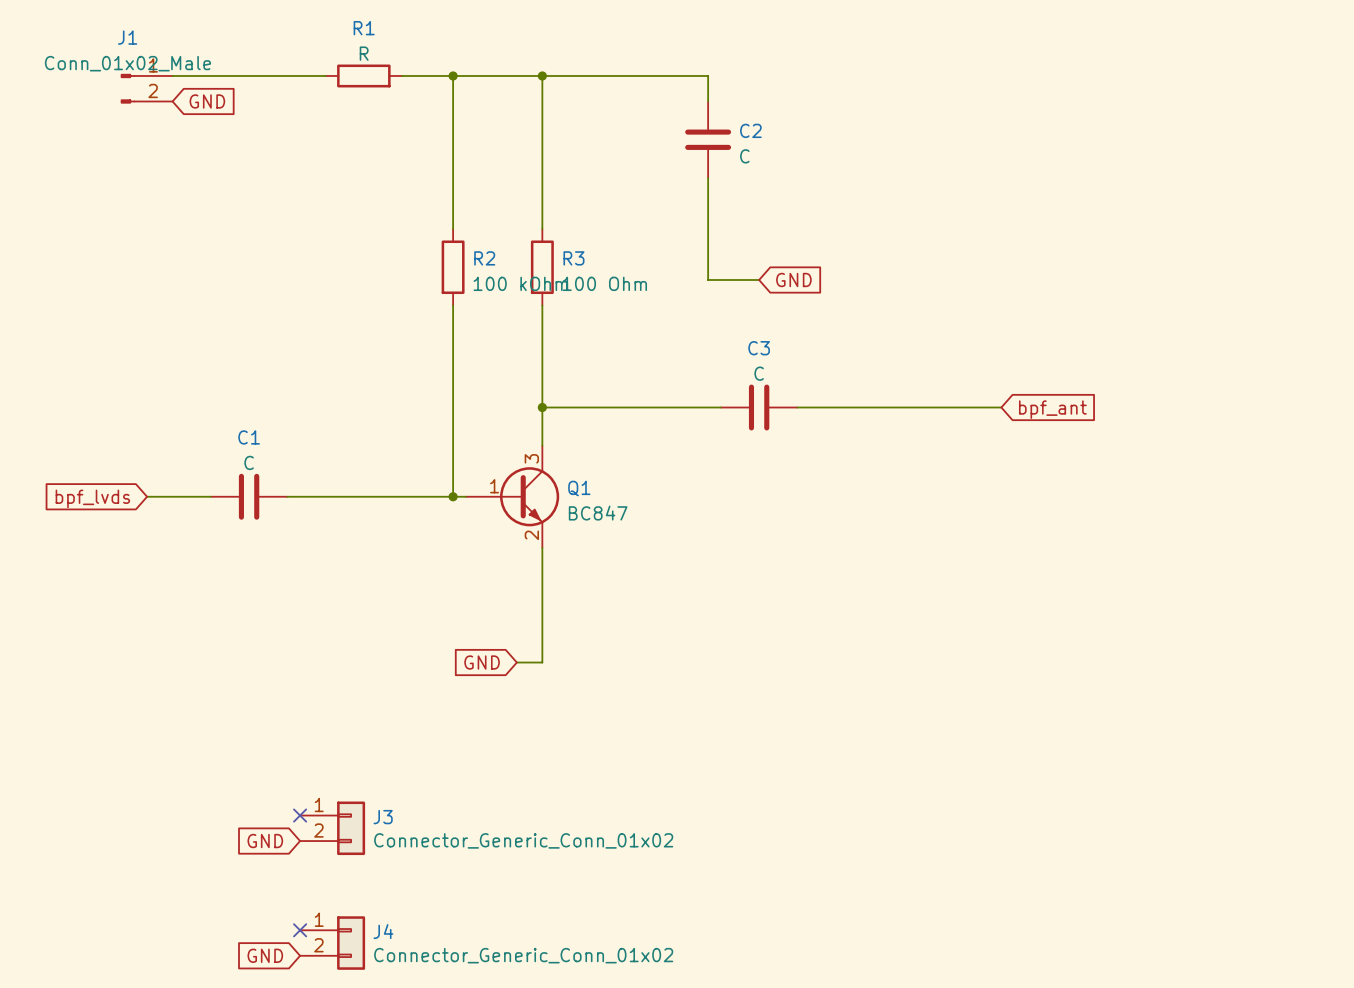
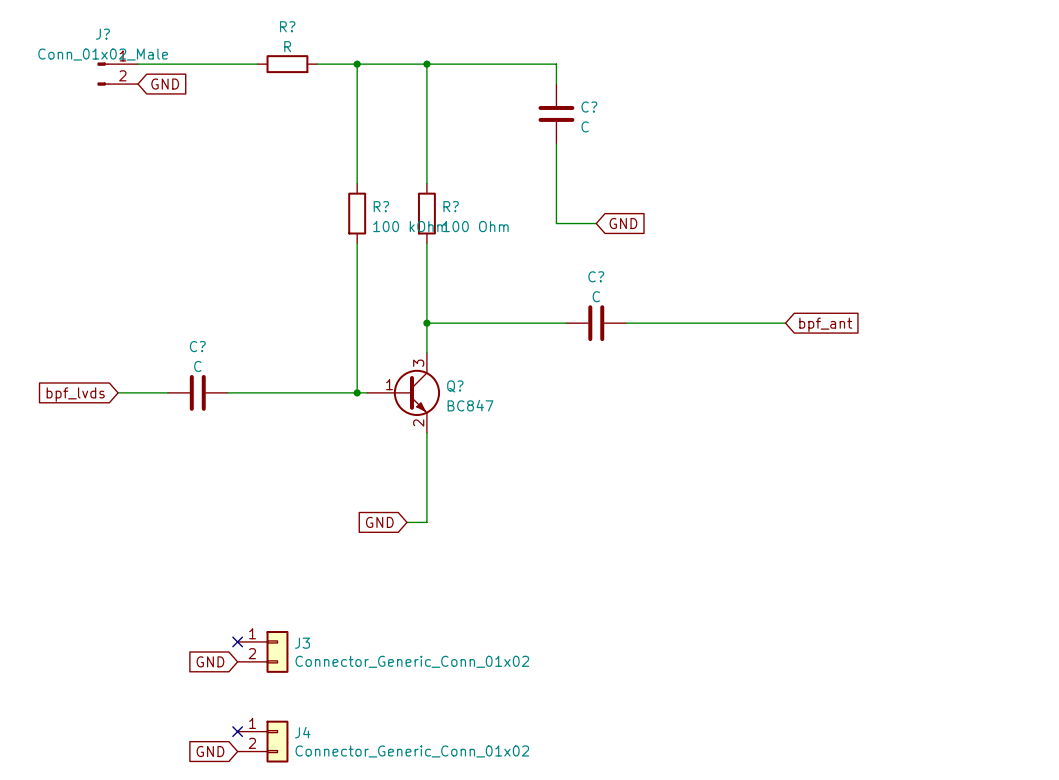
R1 name: R1 (364, 28) -> R? (287, 26)
J1 name: J1 (127, 37) -> J? (102, 34)
C2 name: C2 (750, 130) -> C? (589, 107)
R2 name: R2 (484, 258) -> R? (381, 206)
R3 name: R3 (573, 258) -> R? (451, 206)
C3 name: C3 (759, 348) -> C? (596, 276)
C1 name: C1 (249, 437) -> C? (197, 346)
Q1 name: Q1 (579, 488) -> Q? (455, 386)

